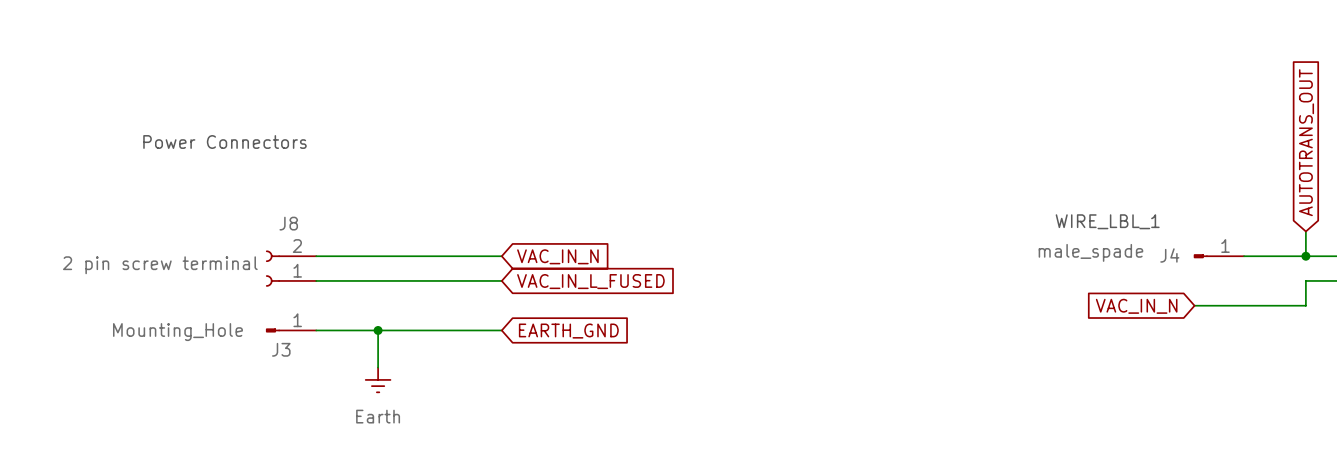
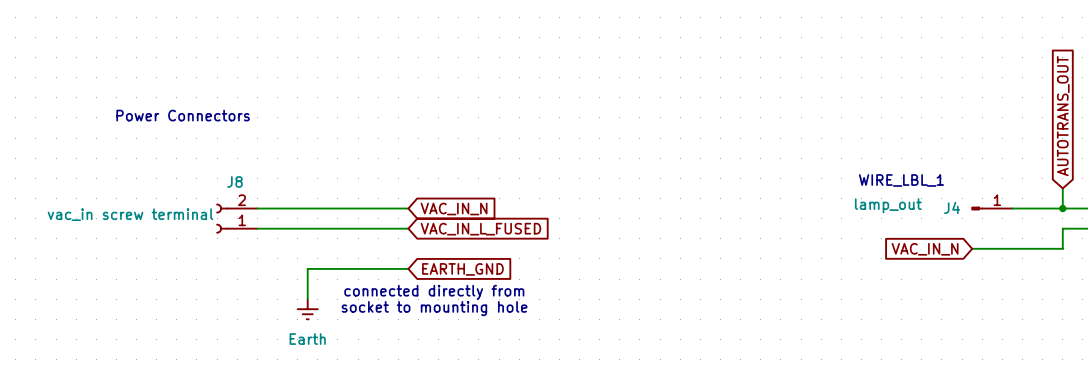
J4 value: male_spade (1090, 252) -> lamp_out (888, 205)
J8 value: 2 pin screw terminal (160, 265) -> vac_in screw terminal (130, 214)
J3: Mounting_Hole (291, 330) -> none
wire: (316, 330) (378, 330) -> none
junction: (378, 330) -> none
text: none -> connected directly from (434, 292)
text: none -> socket to mounting hole (434, 308)

